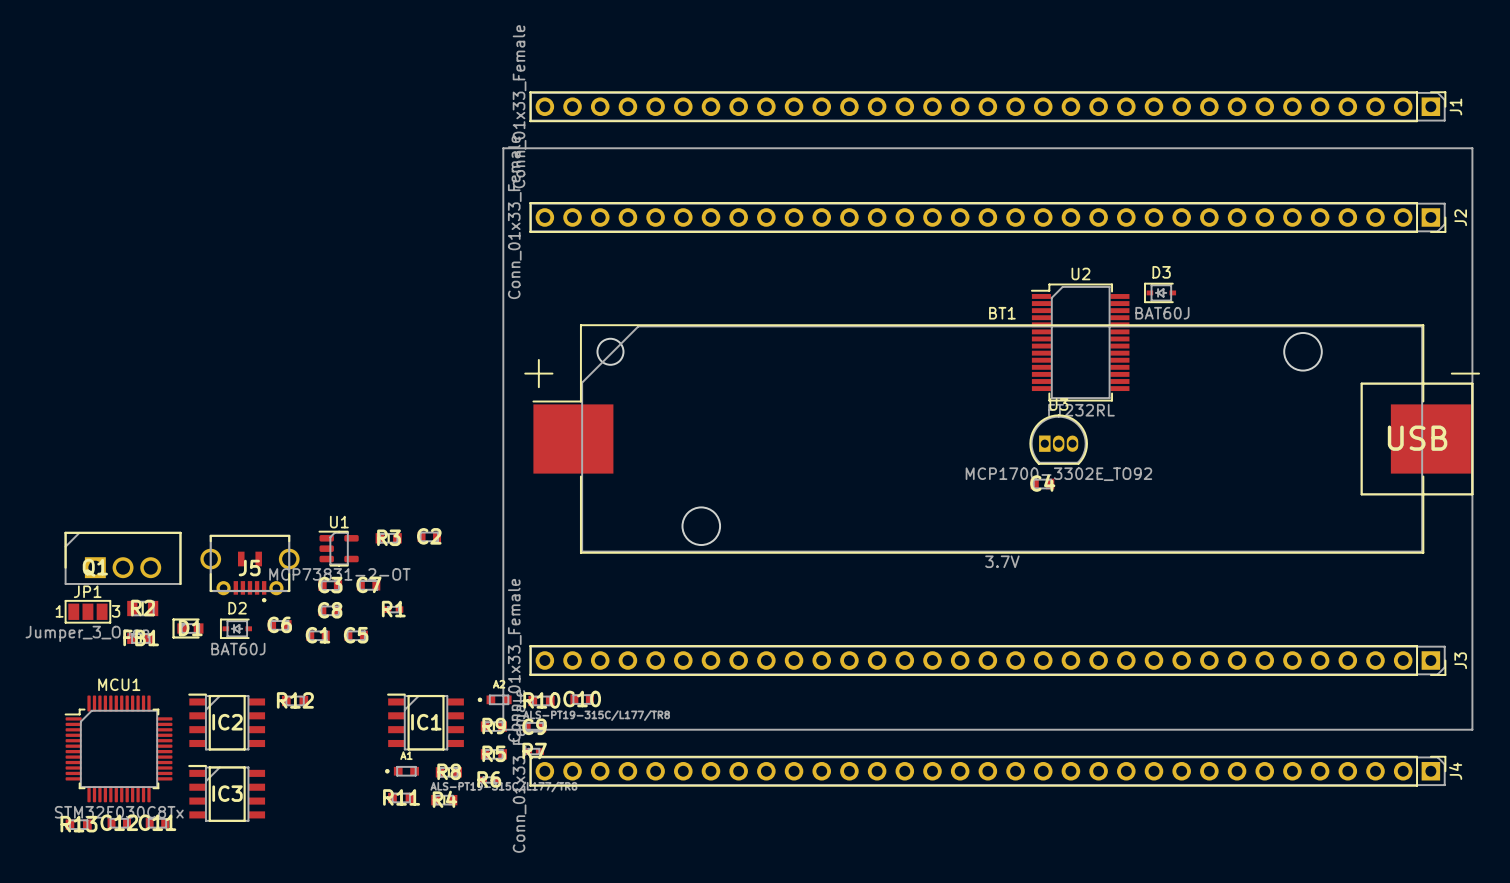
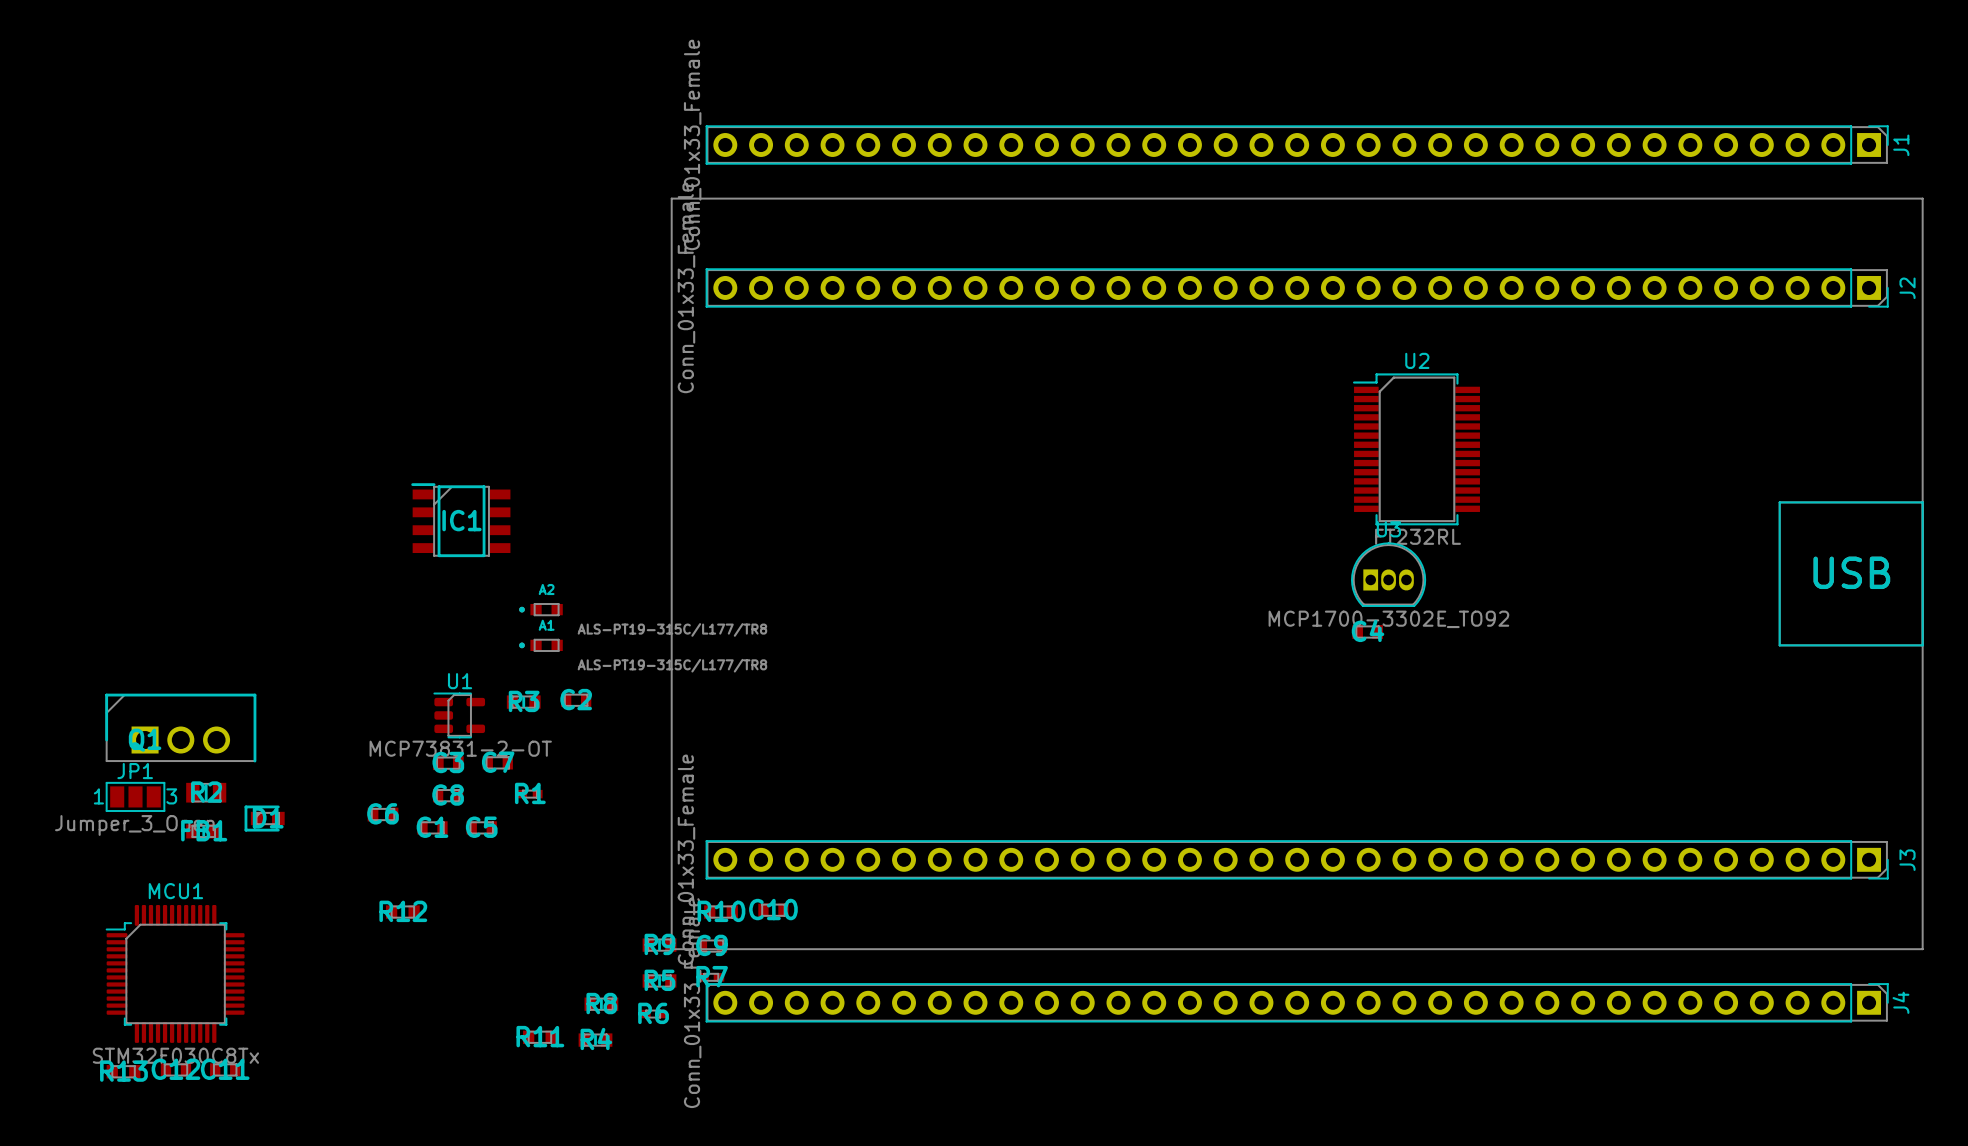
D3: BAT60J (1160, 292) -> none
BT1: 3.7V (1002, 438) -> none
J5: (249, 568) -> none
D2: BAT60J (236, 628) -> none
IC1 footprint: [387, 693, 464, 751] -> [411, 483, 511, 558]
A2 position: (494, 699) -> (540, 609)
IC2: (226, 722) -> none
A1 position: (402, 771) -> (540, 645)
IC3: (226, 793) -> none

